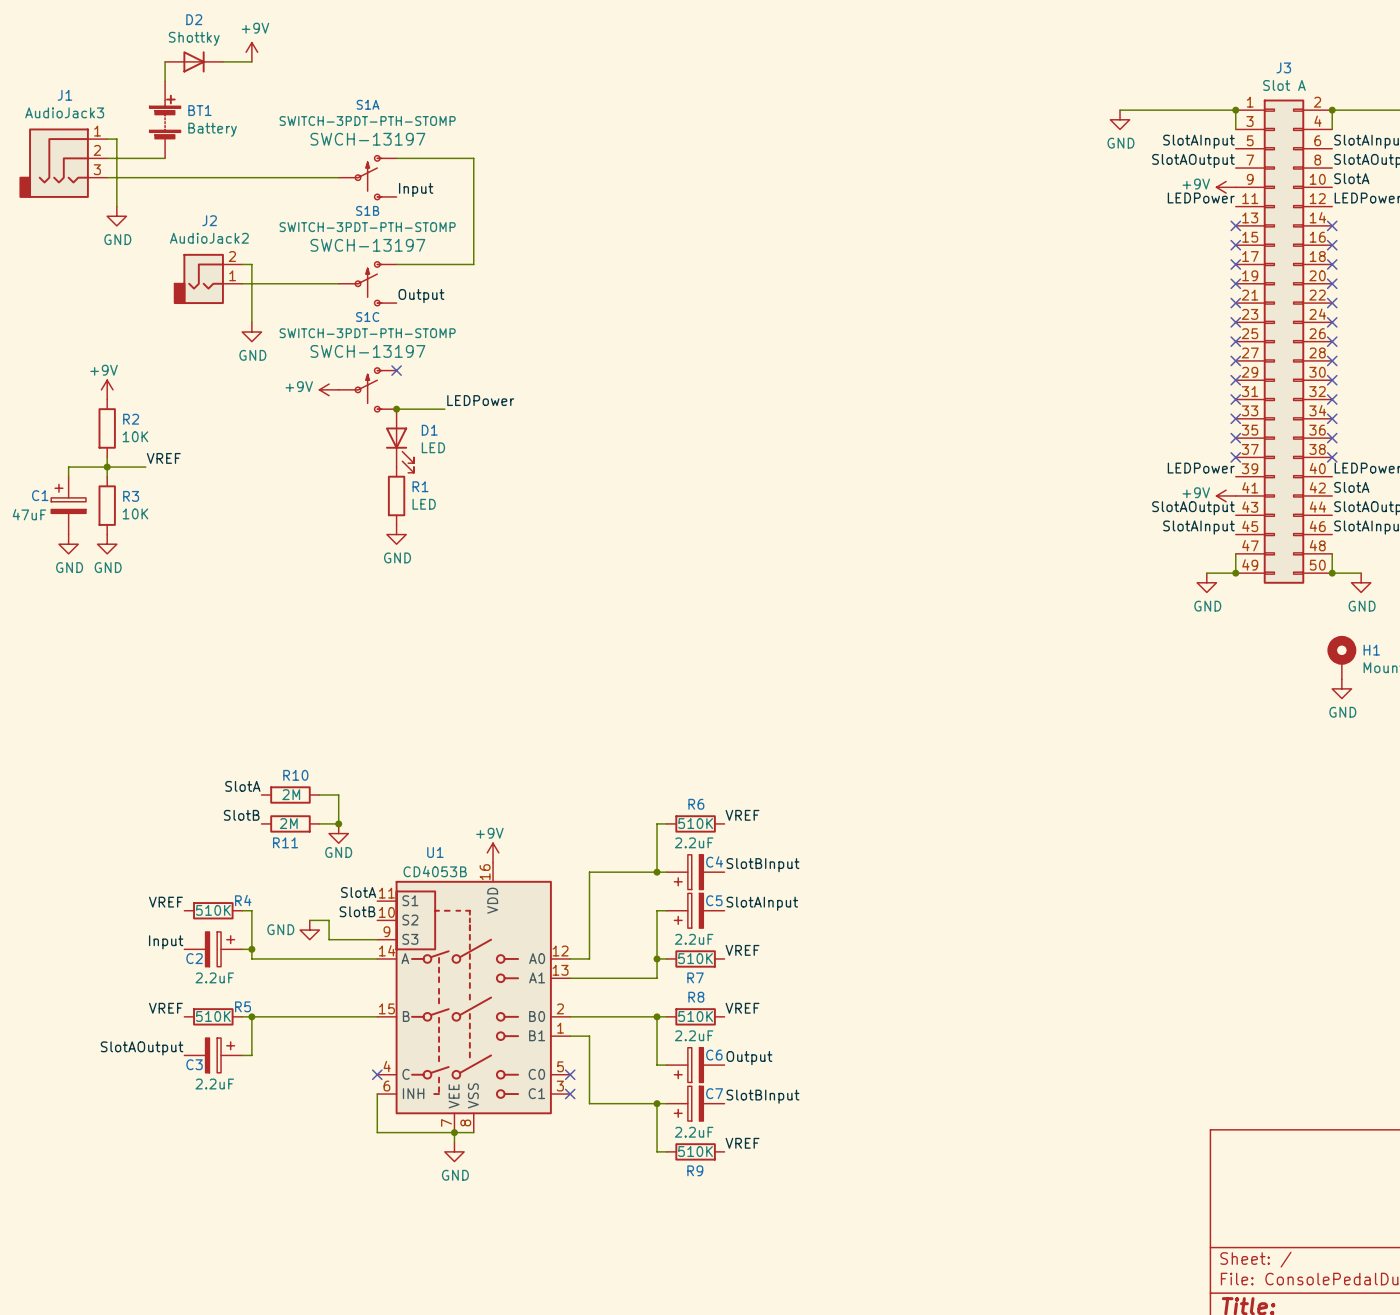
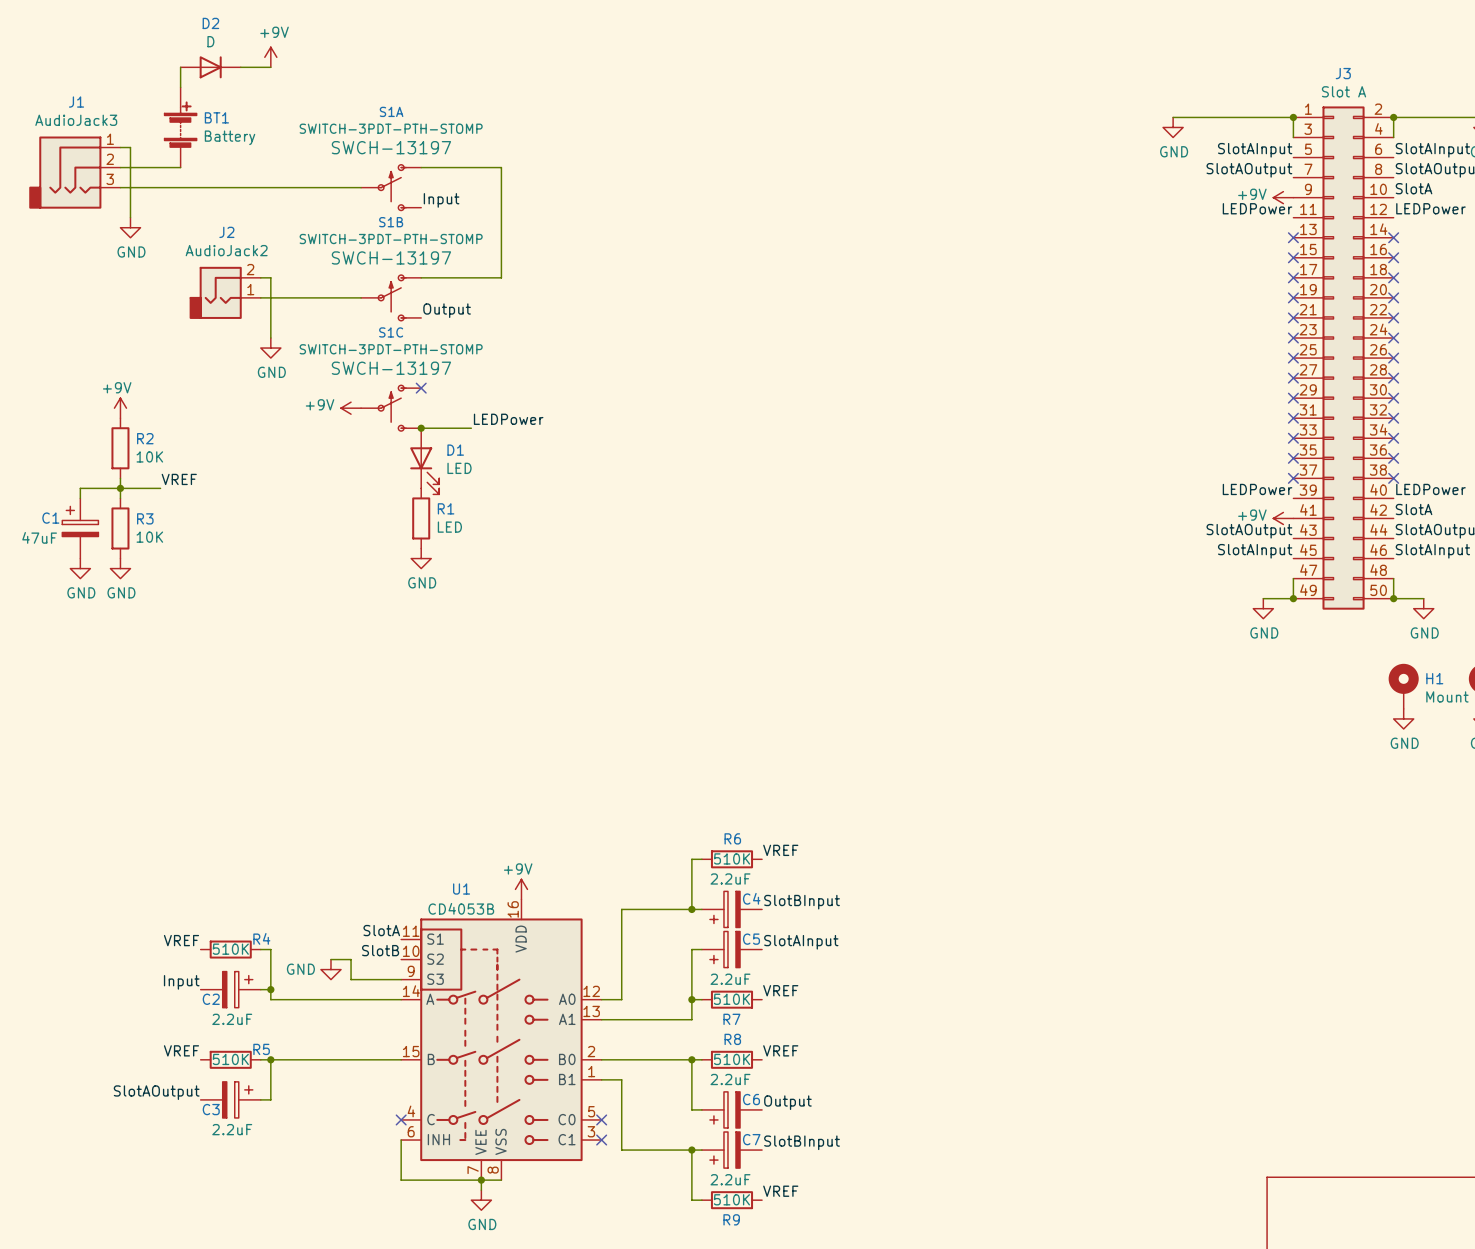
D2 value: Shottky (194, 38) -> D (210, 41)
label: SlotA (242, 786) -> none
R10: 2M (290, 795) -> none
wire: (319, 795) (338, 795) (338, 823) (319, 823) -> none
label: SlotB (241, 815) -> none
R11: 2M (290, 823) -> none
junction: (338, 823) -> none
power symbol: GND (338, 833) -> none

